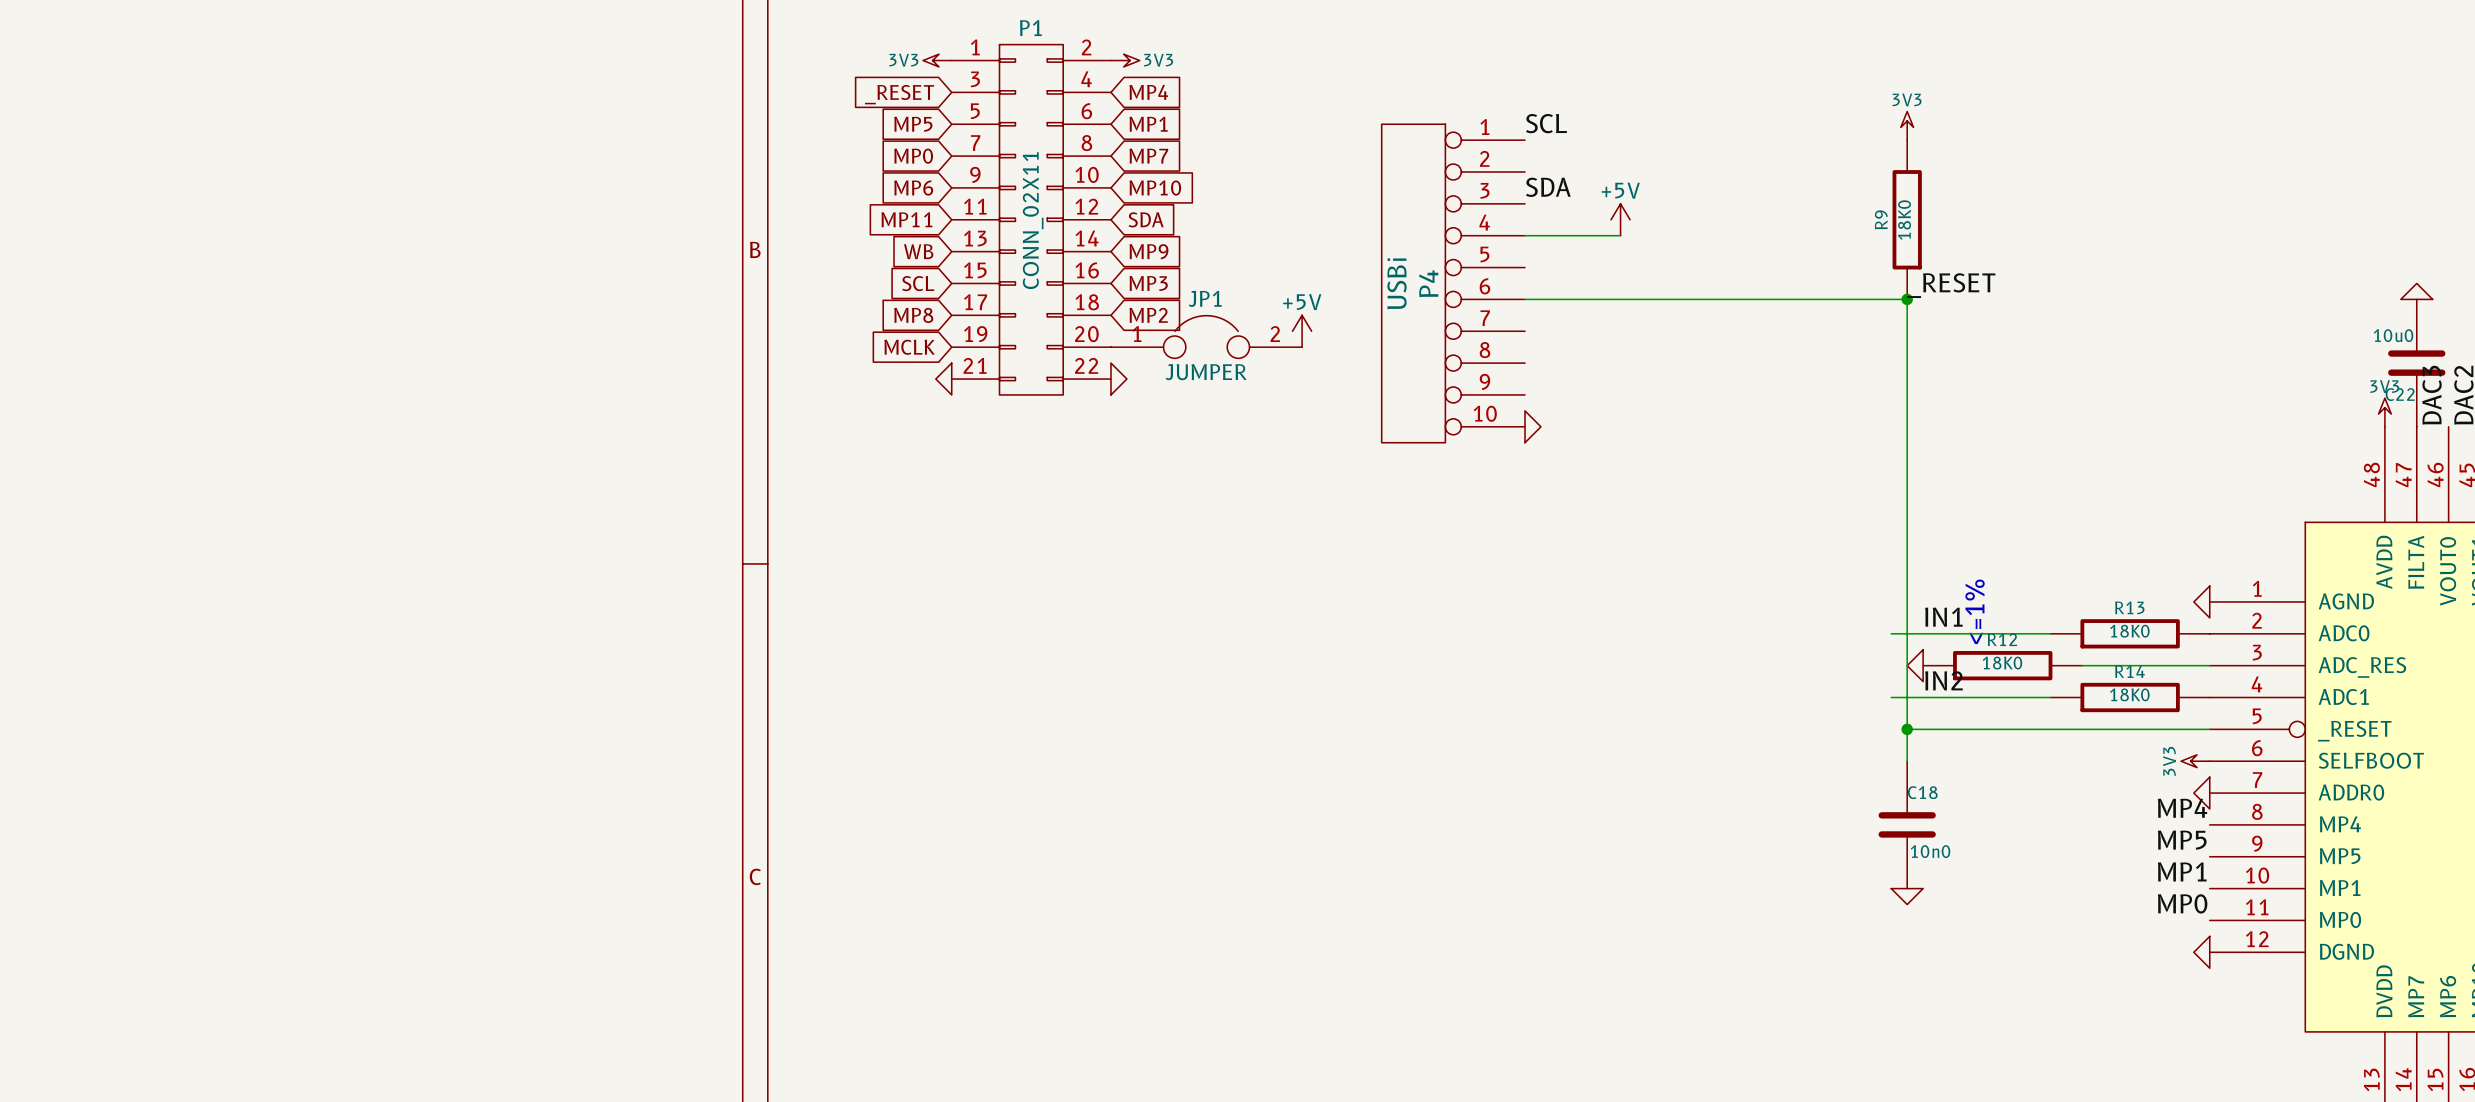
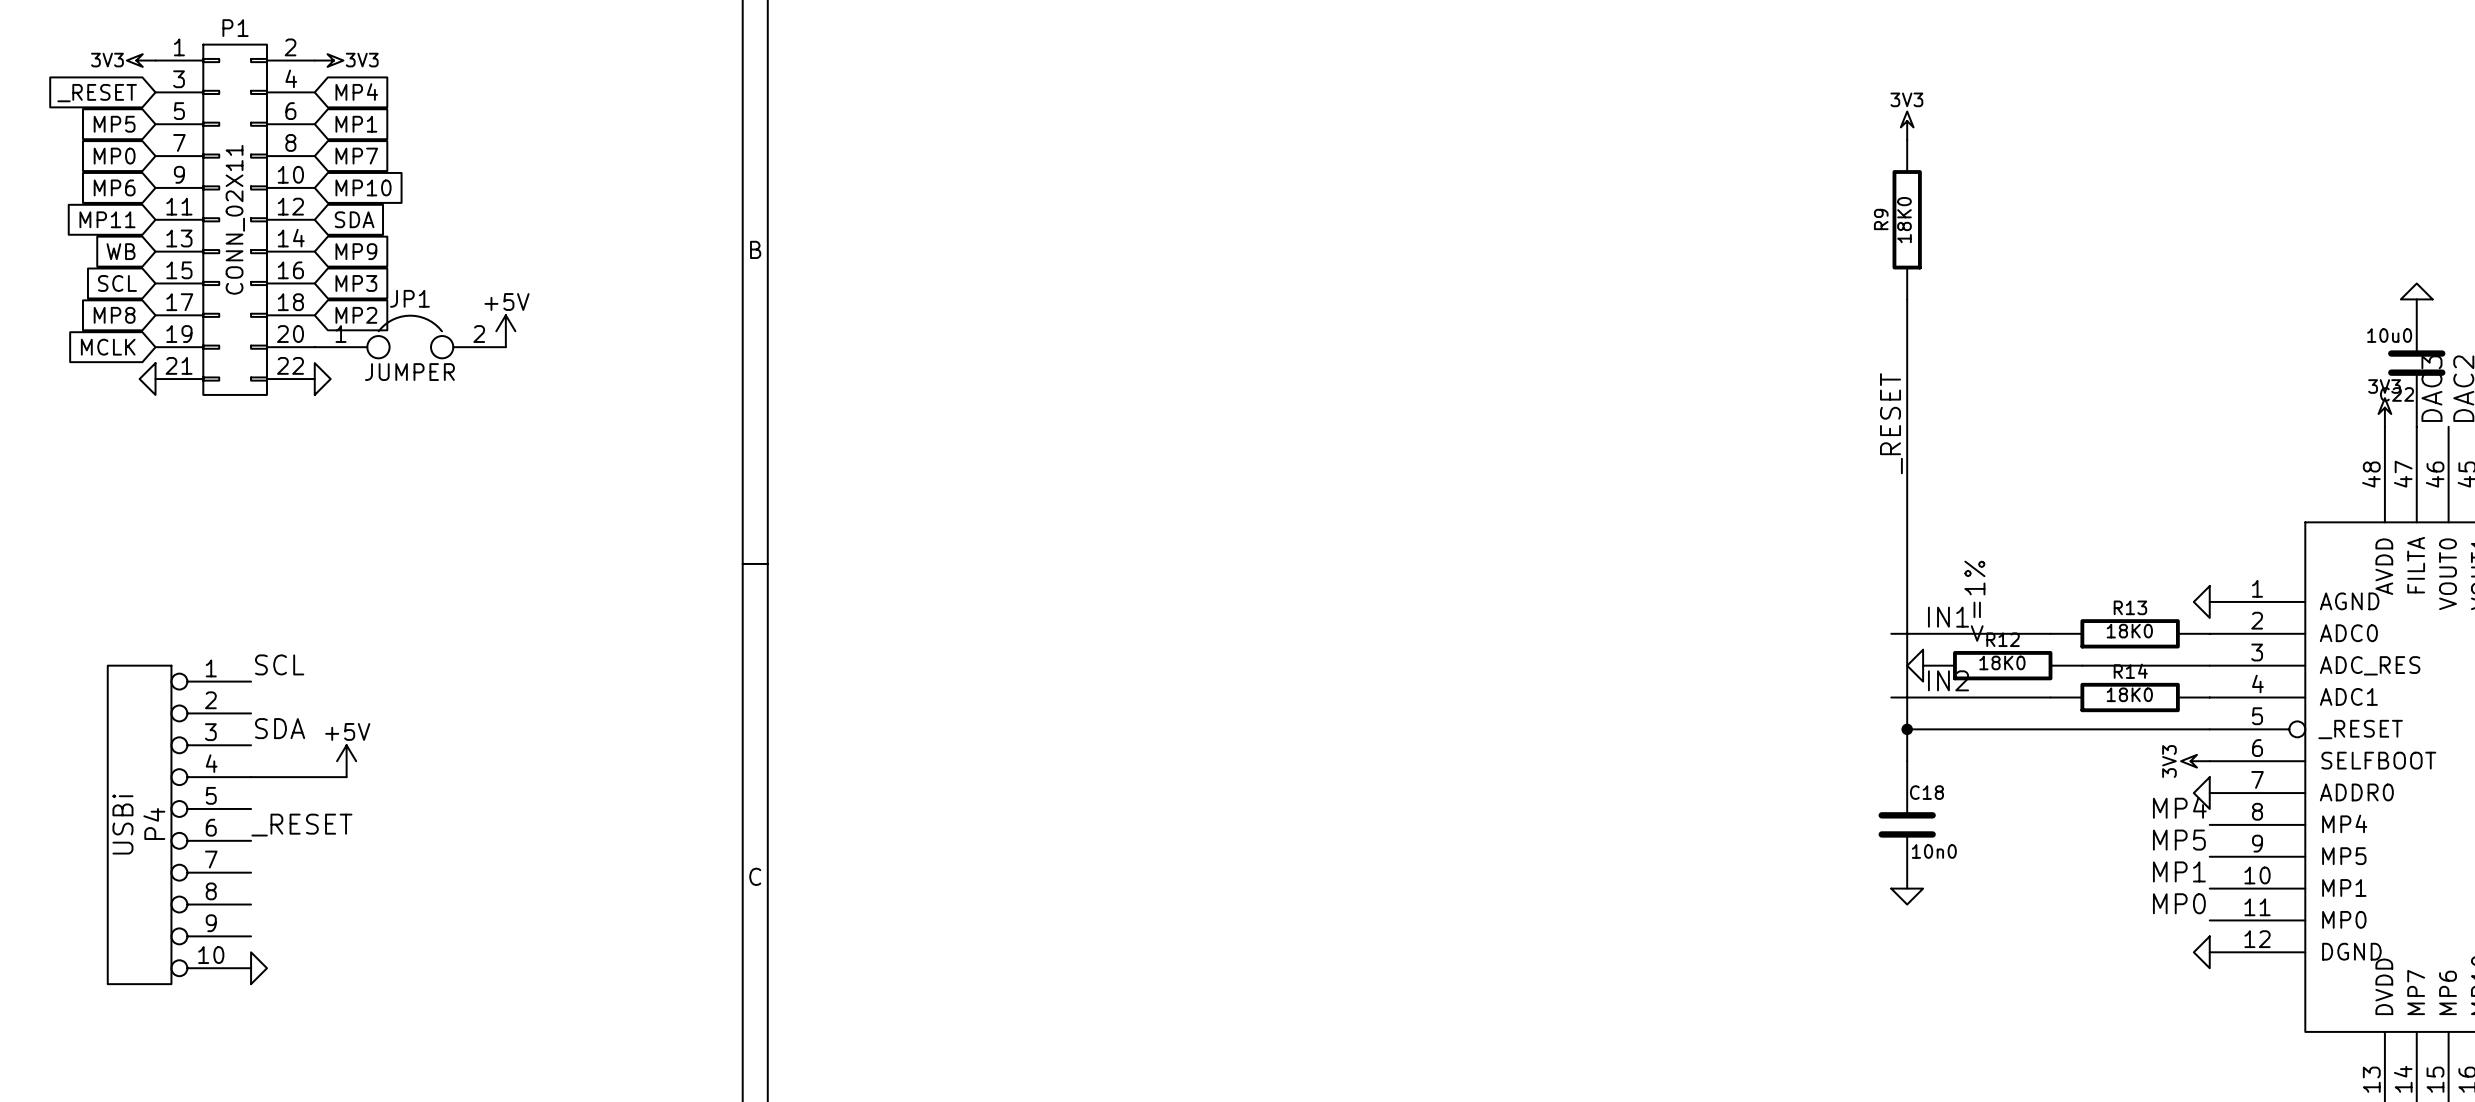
power symbol: none -> 3V3 (141, 60)
power symbol: none -> 3V3 (329, 60)
power symbol: 3V3 (937, 60) -> none
power symbol: 3V3 (1125, 60) -> none
global label: none -> MP4 (356, 92)
global label: MP4 (1148, 92) -> none
global label: none -> _RESET (97, 93)
global label: _RESET (899, 94) -> none
label: SCL (1546, 123) -> none
global label: none -> MP5 (114, 124)
global label: none -> MP1 (356, 124)
global label: MP5 (913, 124) -> none
global label: MP1 (1148, 124) -> none
global label: none -> MP0 (114, 156)
global label: none -> MP7 (356, 156)
global label: MP0 (913, 156) -> none
global label: MP7 (1148, 156) -> none
label: SDA (1548, 187) -> none
global label: none -> MP6 (114, 187)
global label: none -> MP10 (363, 187)
global label: MP6 (913, 188) -> none
global label: MP10 (1155, 188) -> none
global label: none -> MP11 (107, 219)
global label: none -> SDA (354, 219)
global label: MP11 (906, 219) -> none
P1 position: (1031, 219) -> (235, 219)
global label: SDA (1146, 219) -> none
power symbol: +5V (1620, 219) -> none
wire: (1525, 235) (1620, 235) -> none
global label: none -> WB (121, 251)
global label: none -> MP9 (356, 251)
global label: WB (918, 251) -> none
global label: MP9 (1148, 251) -> none
global label: none -> SCL (117, 283)
global label: none -> MP3 (356, 283)
global label: SCL (918, 283) -> none
global label: MP3 (1148, 283) -> none
P4 position: (1453, 283) -> (179, 824)
label rotation: 0° (1951, 285) -> 90° counterclockwise (1891, 423)
label position: _RESET (1951, 285) -> _RESET (1891, 423)
wire: (1525, 299) (1907, 299) -> none
junction: (1907, 299) -> none
global label: none -> MP8 (114, 315)
global label: none -> MP2 (356, 315)
global label: MP8 (913, 315) -> none
global label: MP2 (1148, 315) -> none
power symbol: none -> +5V (505, 331)
power symbol: +5V (1302, 331) -> none
JP1 position: (1206, 336) -> (410, 336)
global label: none -> MCLK (108, 347)
global label: MCLK (909, 347) -> none
power symbol: none -> (147, 379)
power symbol: none -> (322, 379)
power symbol: (943, 379) -> none
power symbol: (1118, 379) -> none
power symbol: (1532, 426) -> none
label: none -> SCL (279, 664)
label: none -> SDA (280, 728)
power symbol: none -> +5V (346, 761)
wire: none -> (251, 777) (346, 777)
label: none -> _RESET (301, 825)
power symbol: none -> (259, 968)

